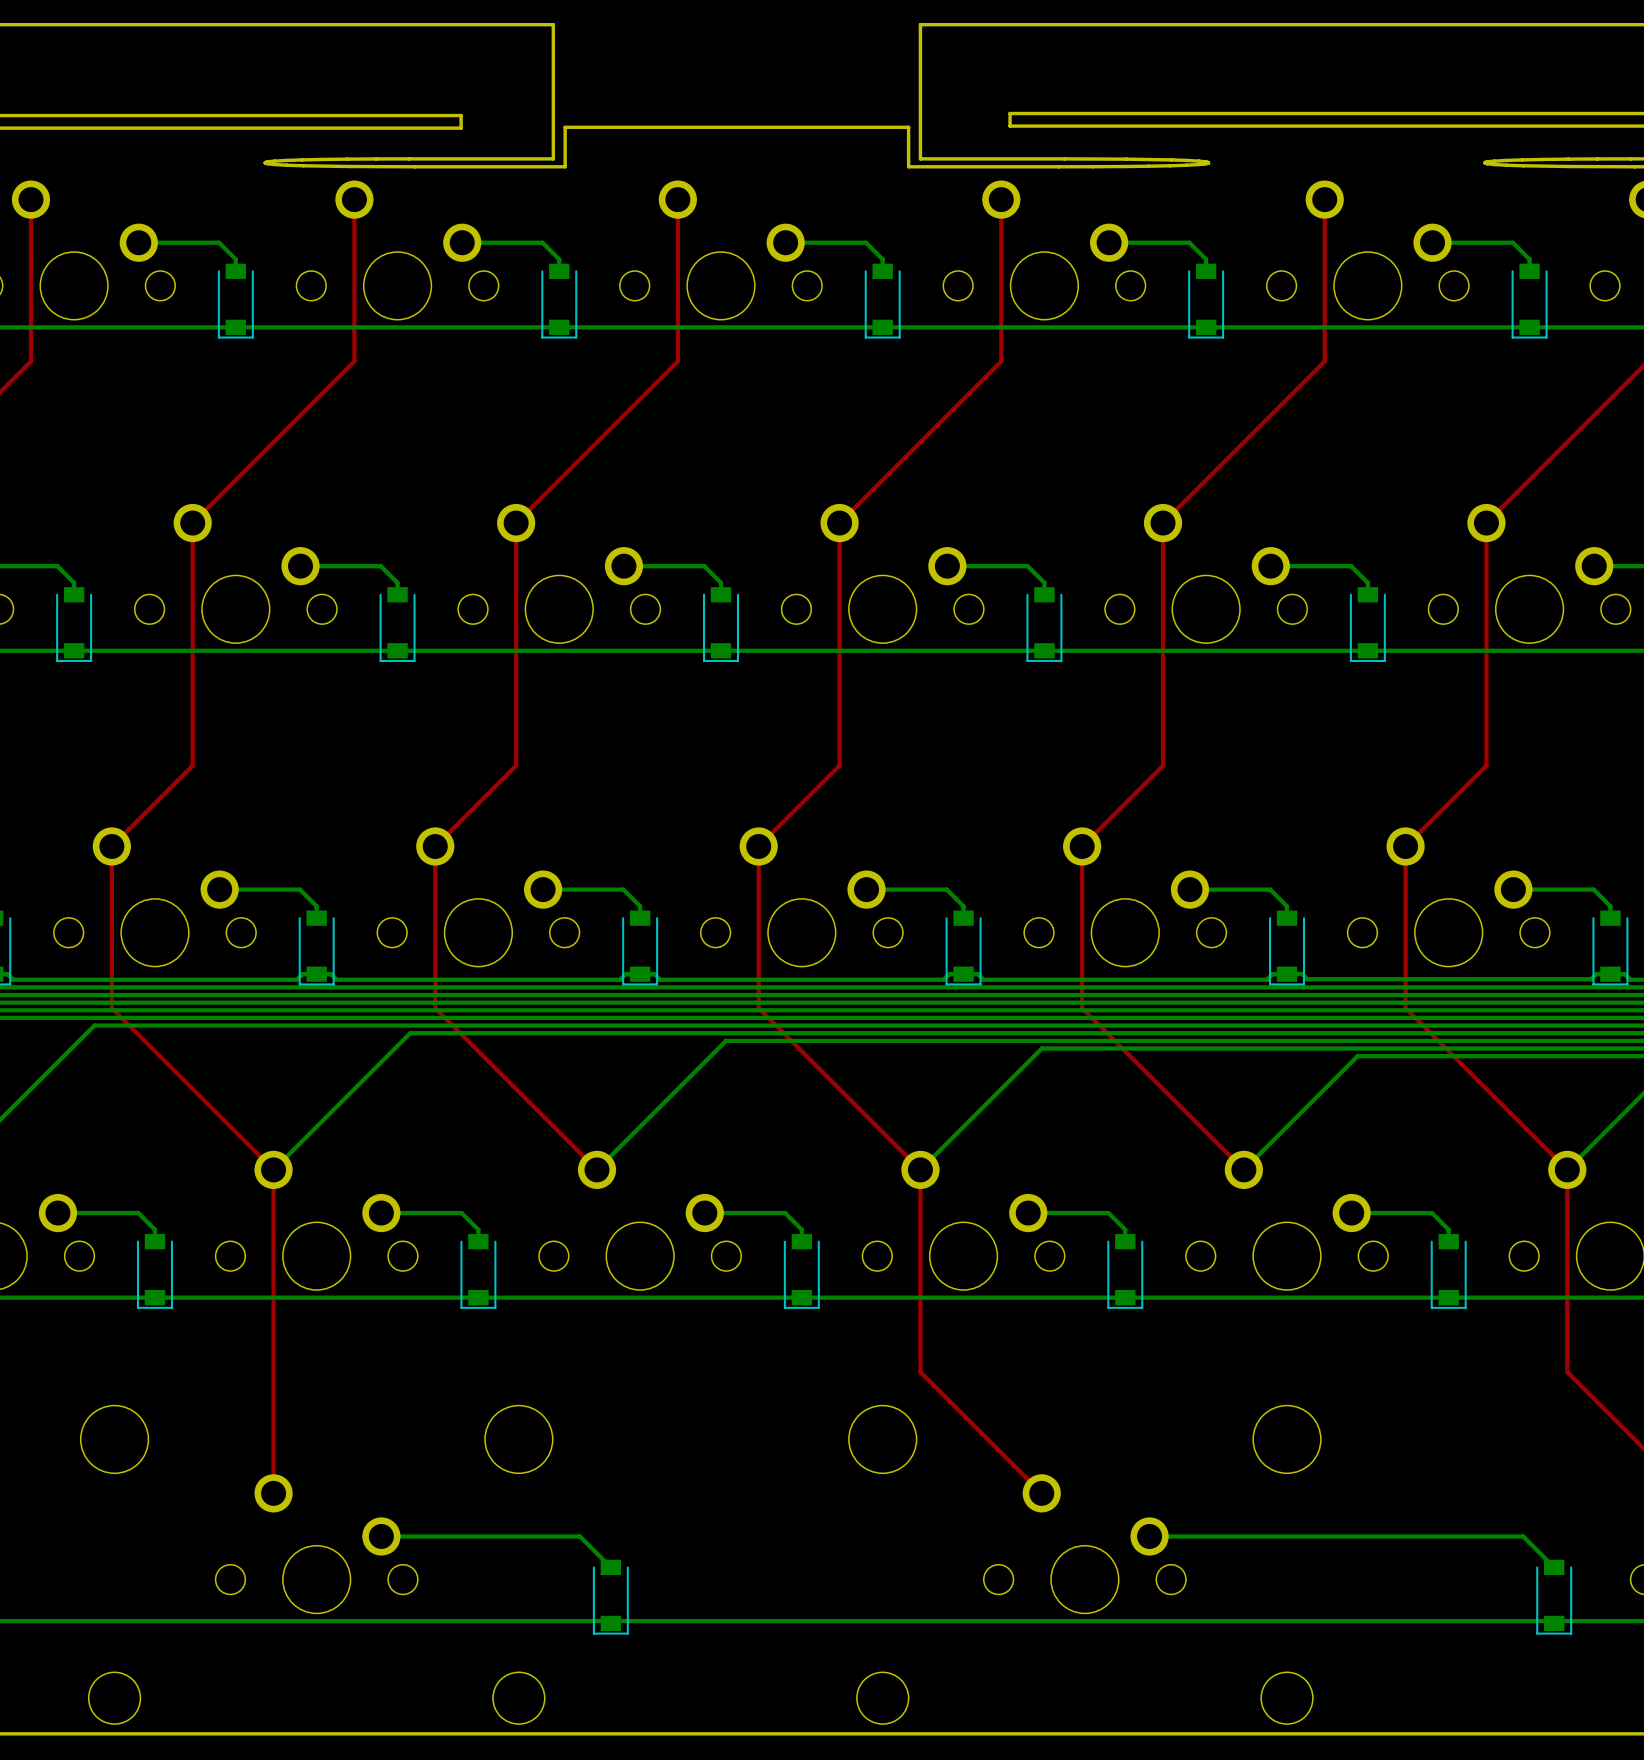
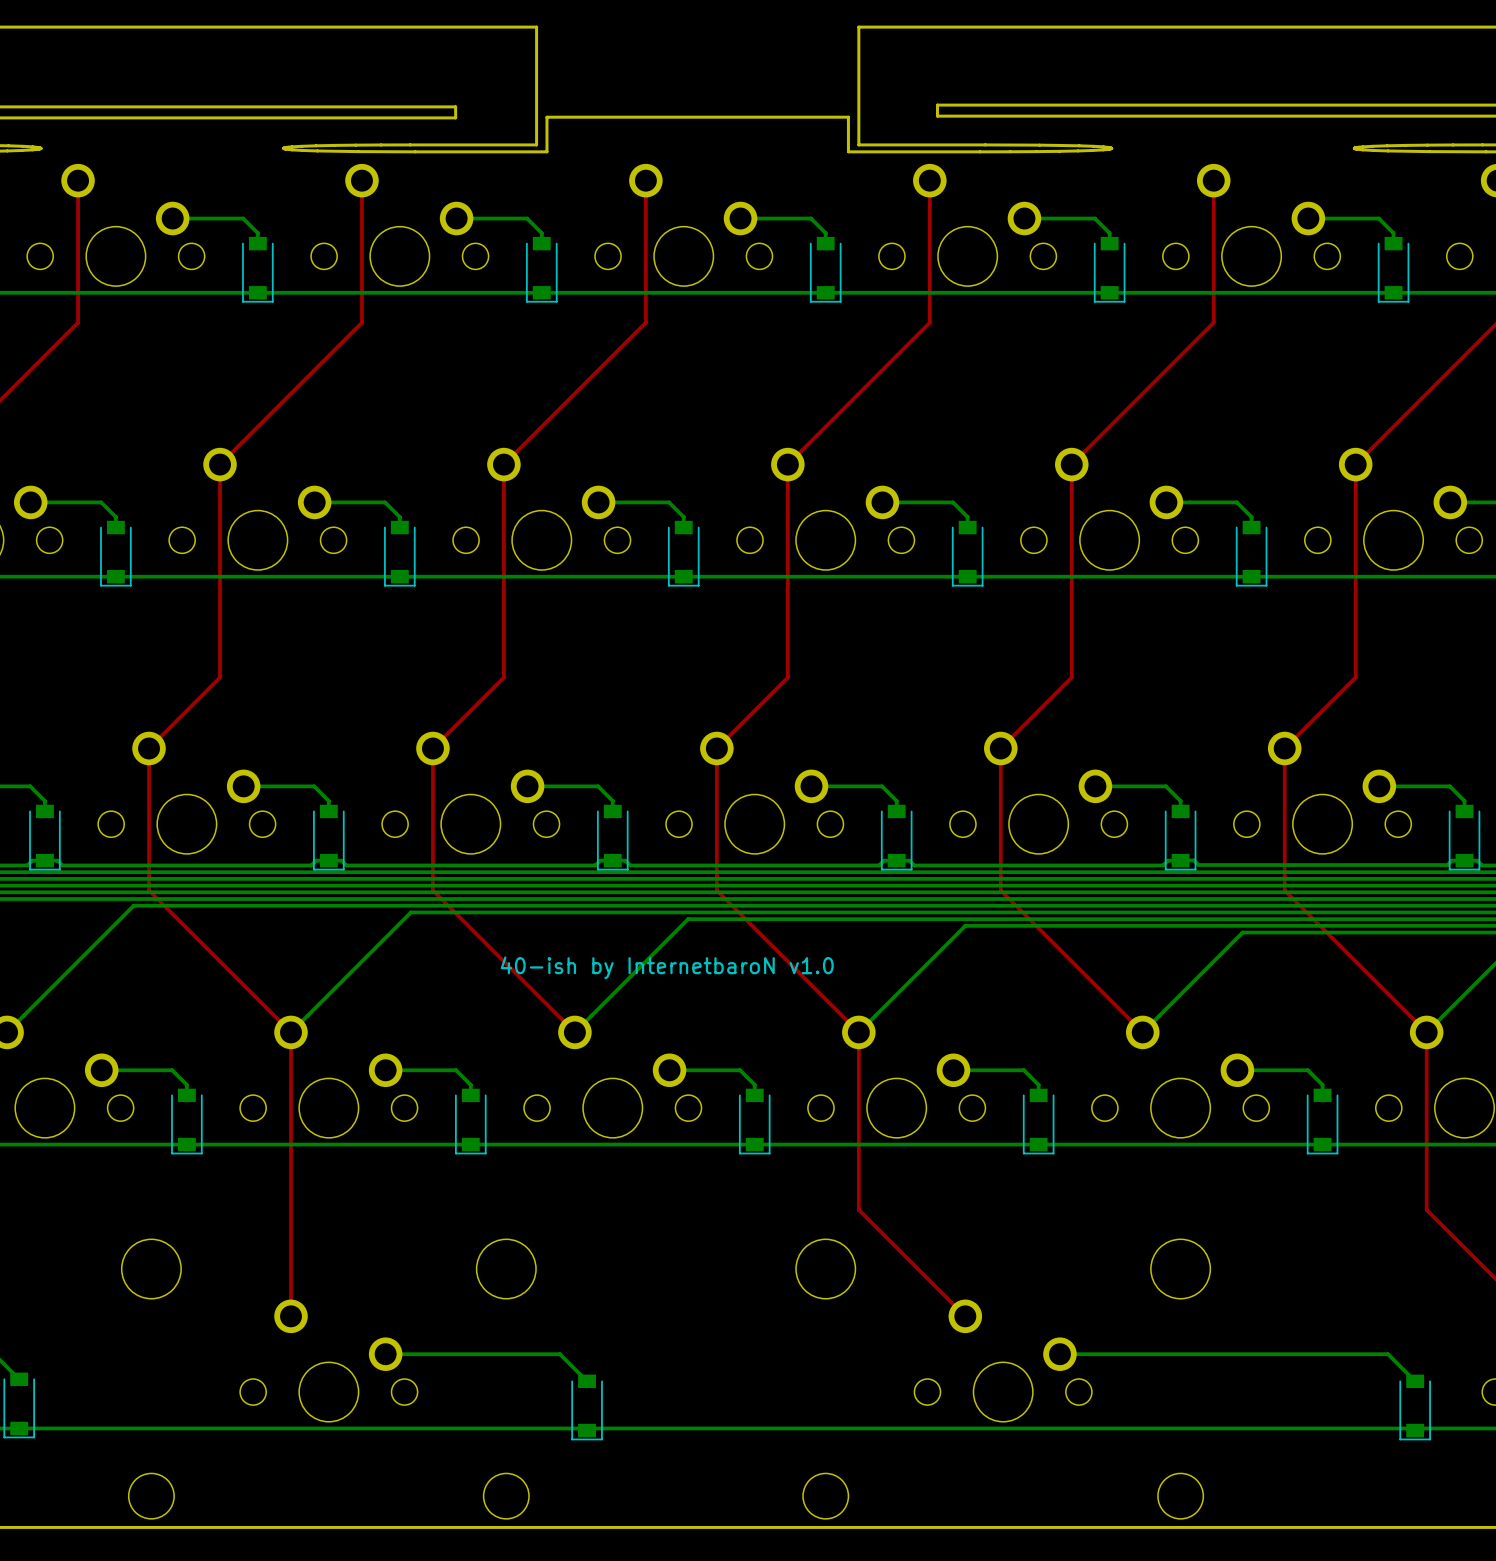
text: none -> 40-ish by InternetbaroN v1.0 (667, 967)

